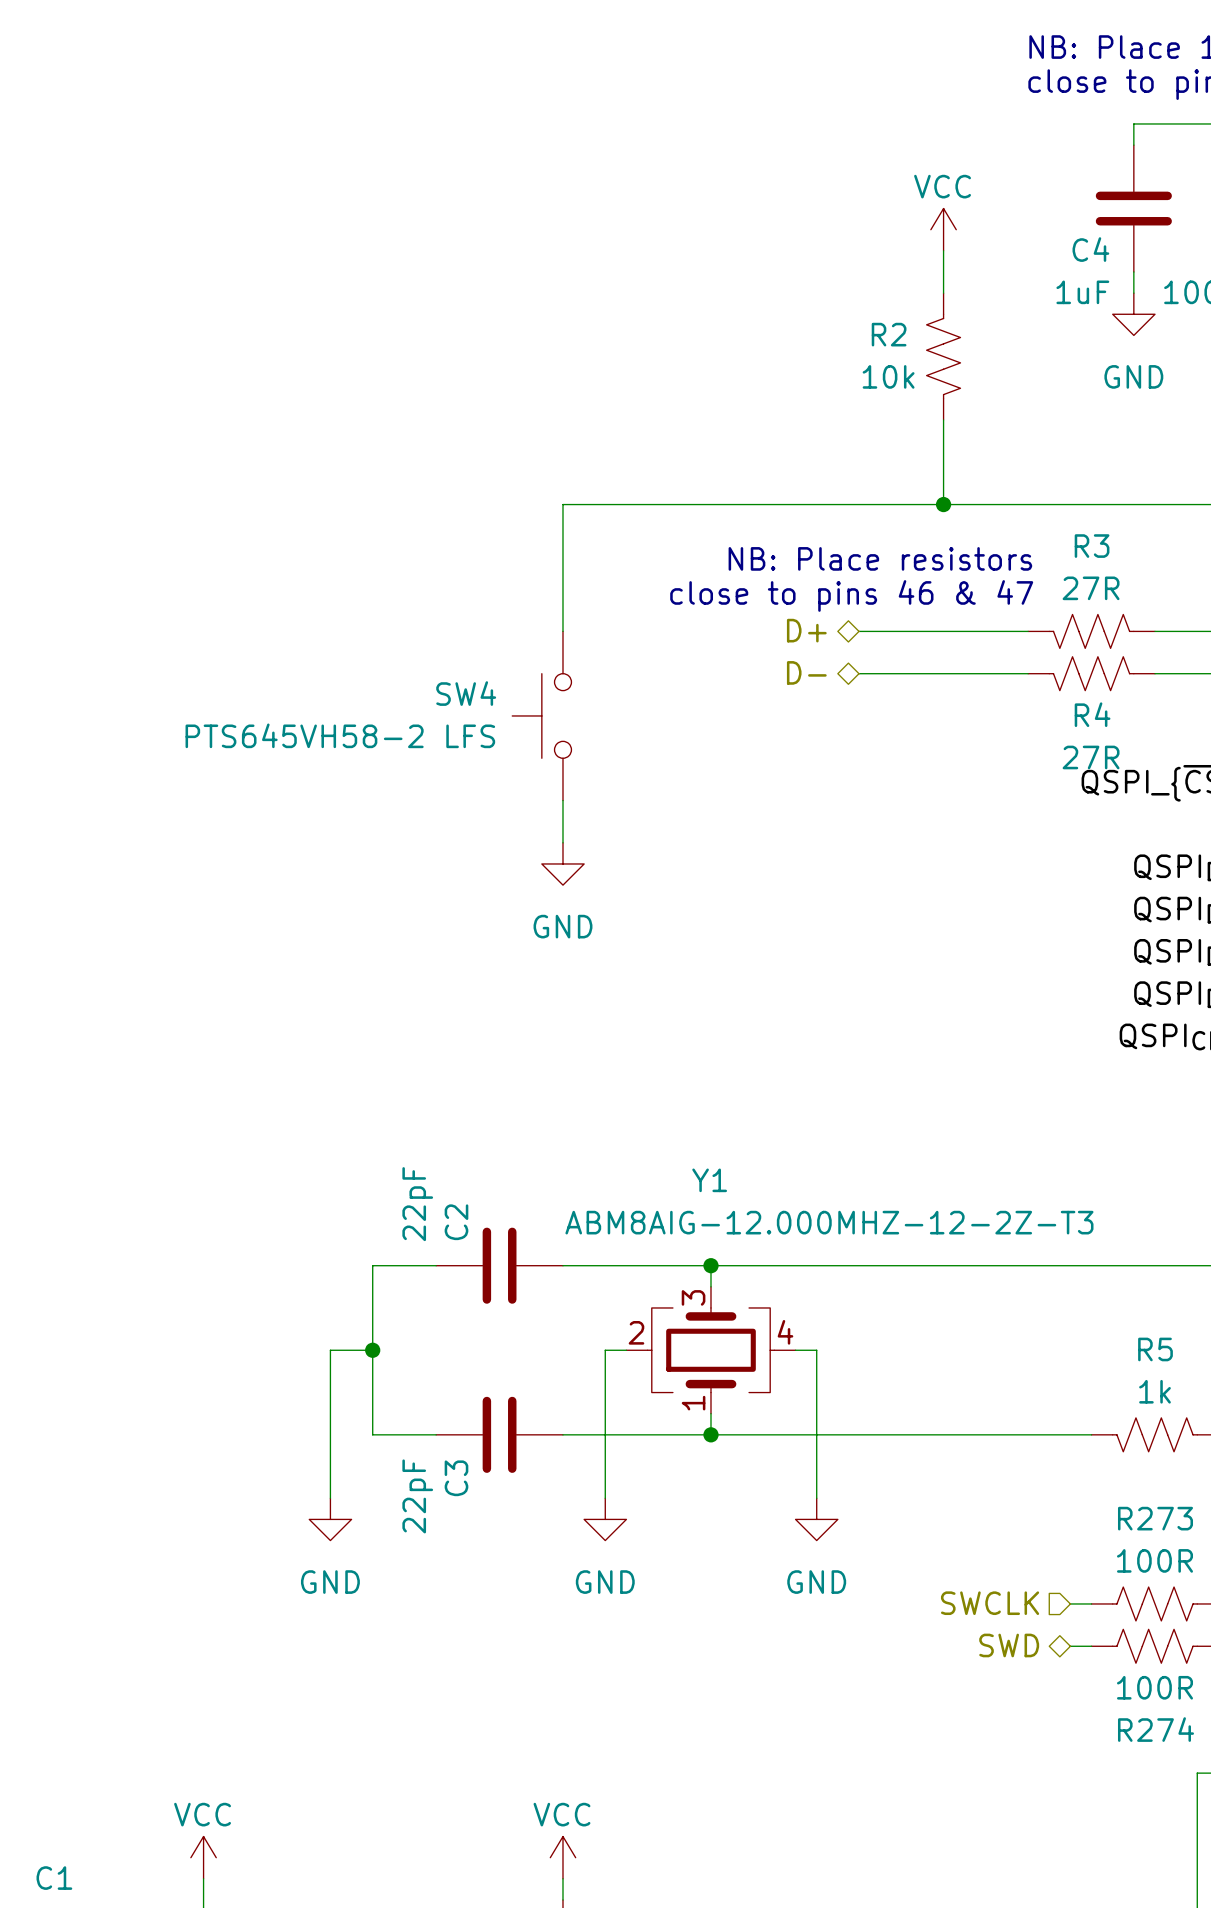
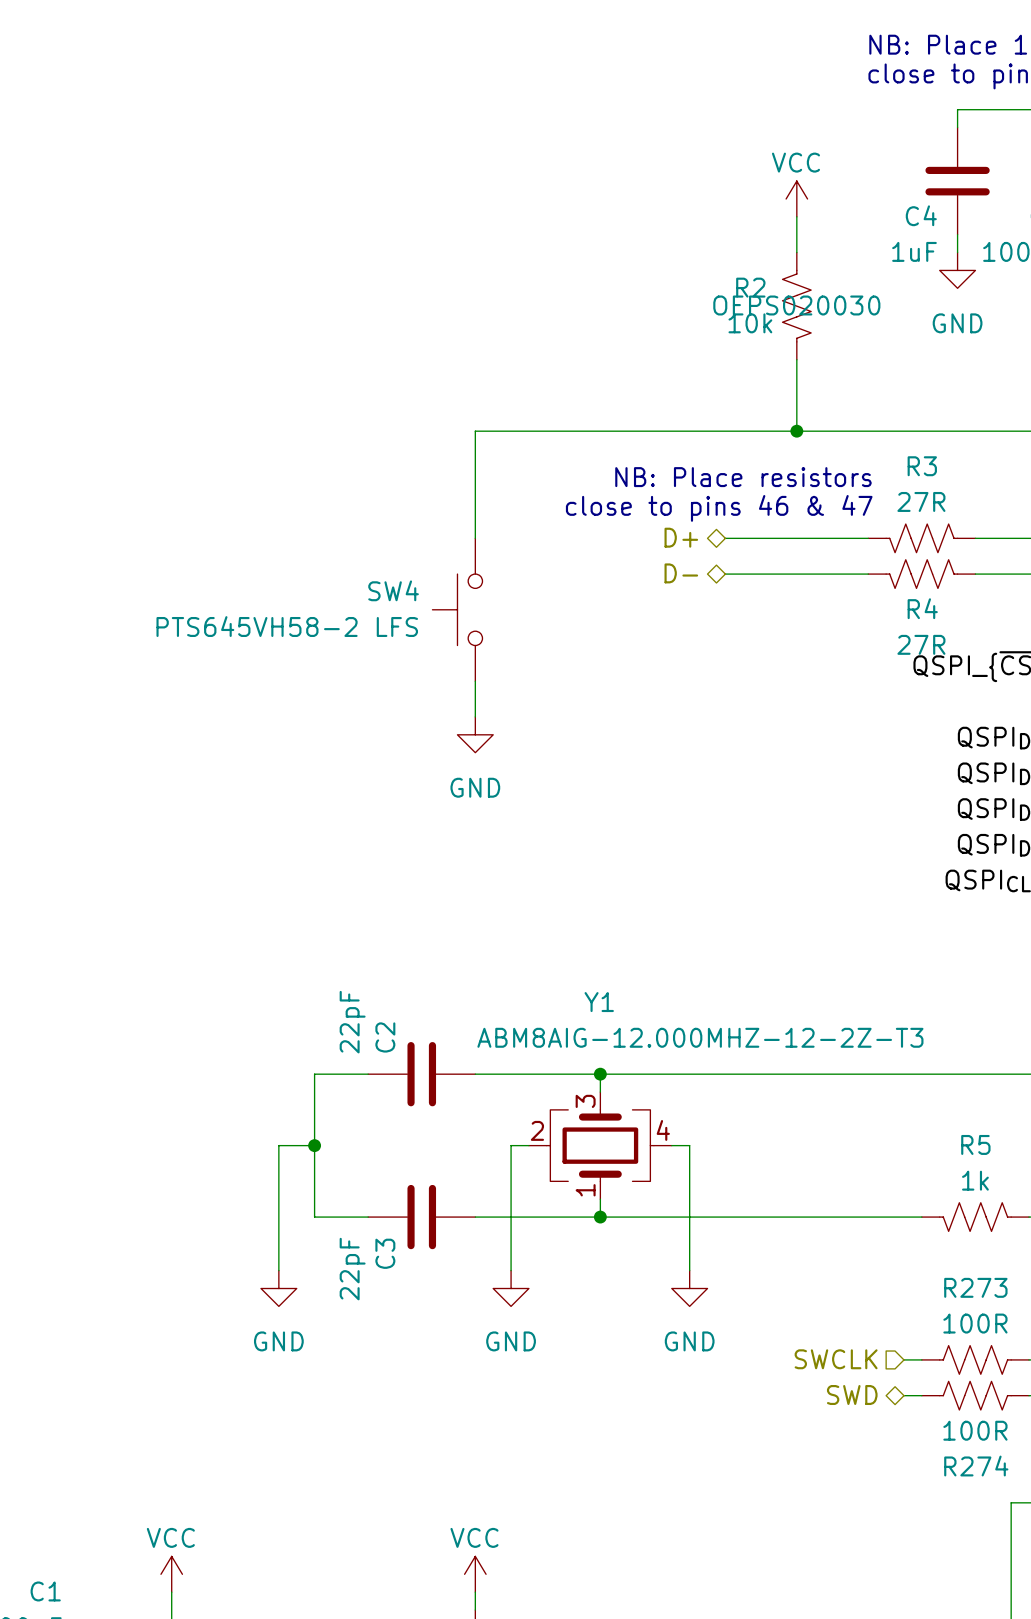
R2 text: none -> OEPS020030 (796, 305)

